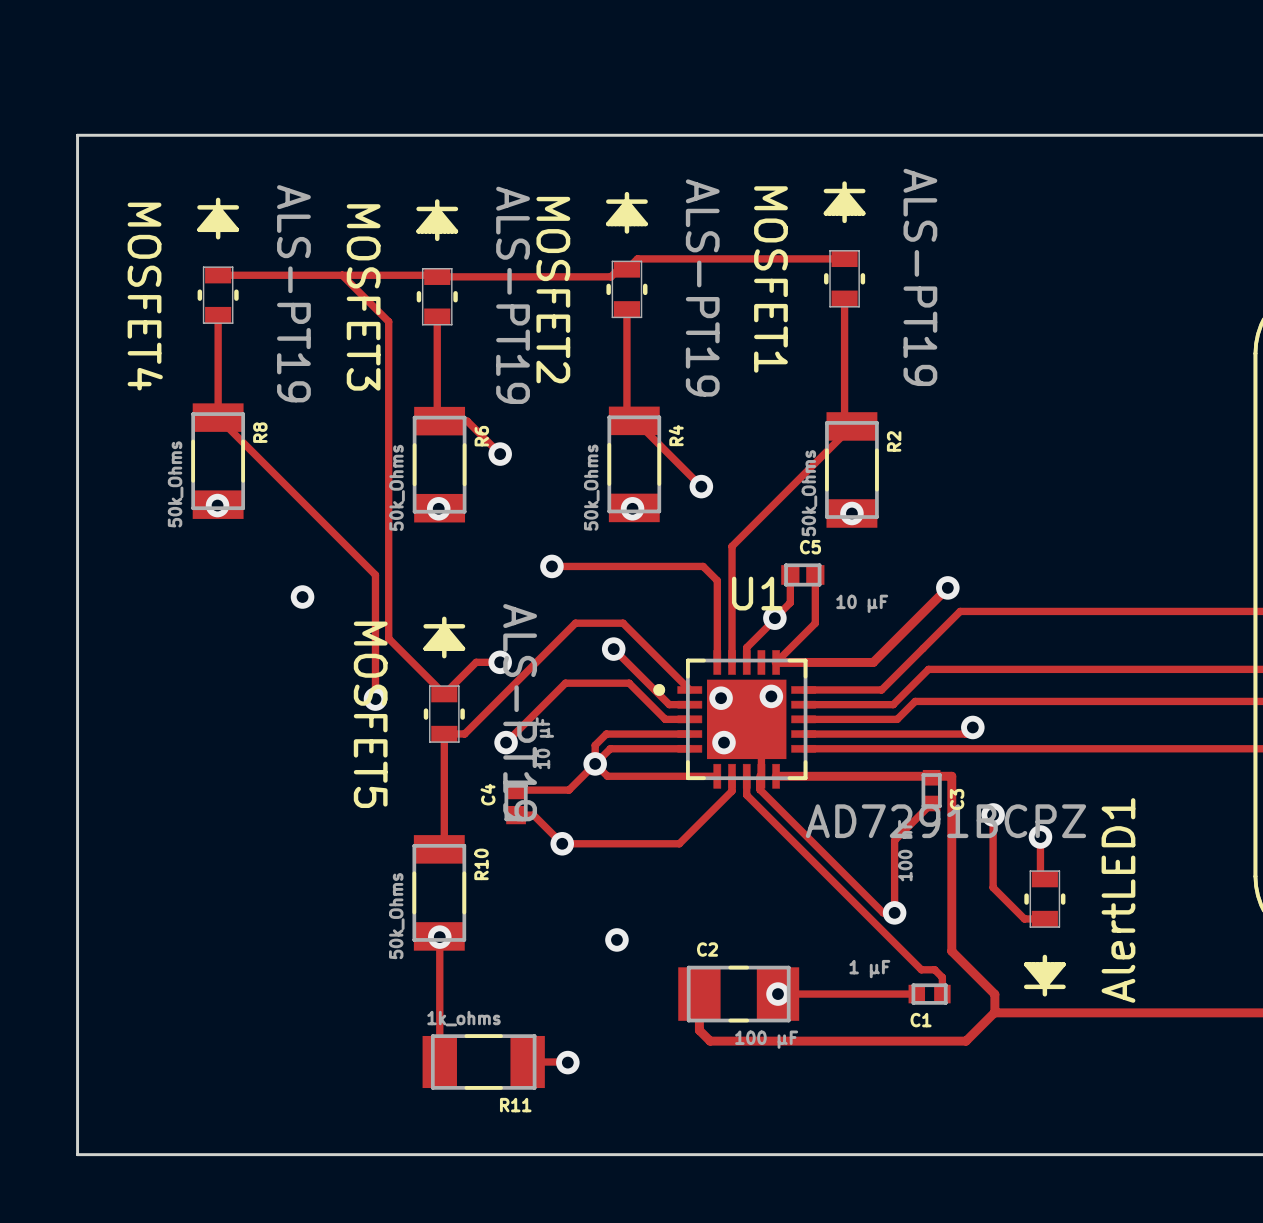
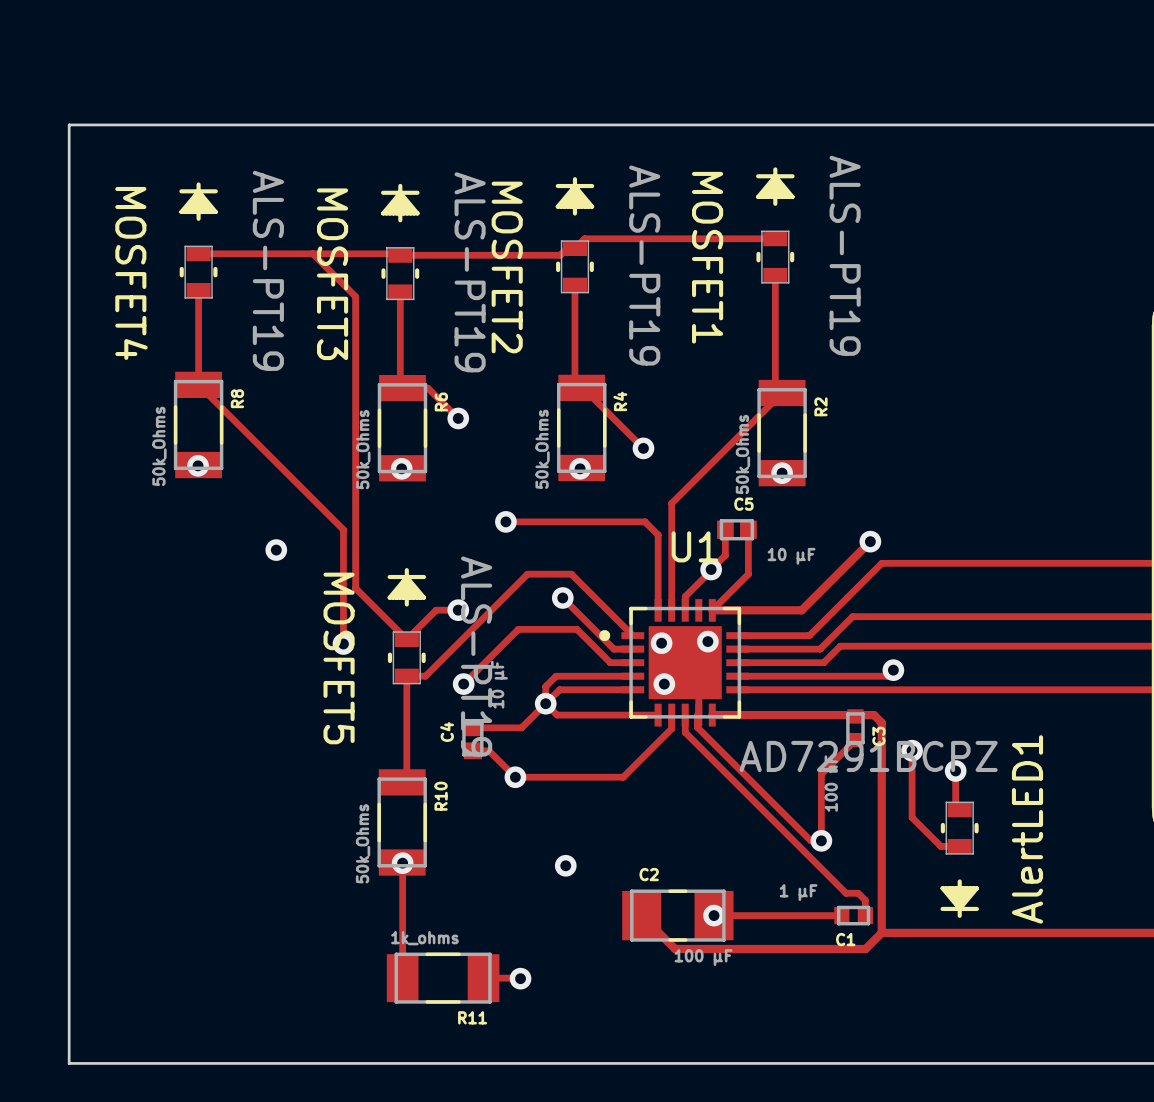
track: (951, 776) (951, 951) (994, 994) (994, 1012) -> (874, 715) (881, 722) (881, 932)
track: (699, 994) (699, 1030) (710, 1041) (966, 1041) (993, 1014) -> (641, 915) (675, 949) (865, 949) (881, 932)
track: none -> (881, 932) (913, 932)

